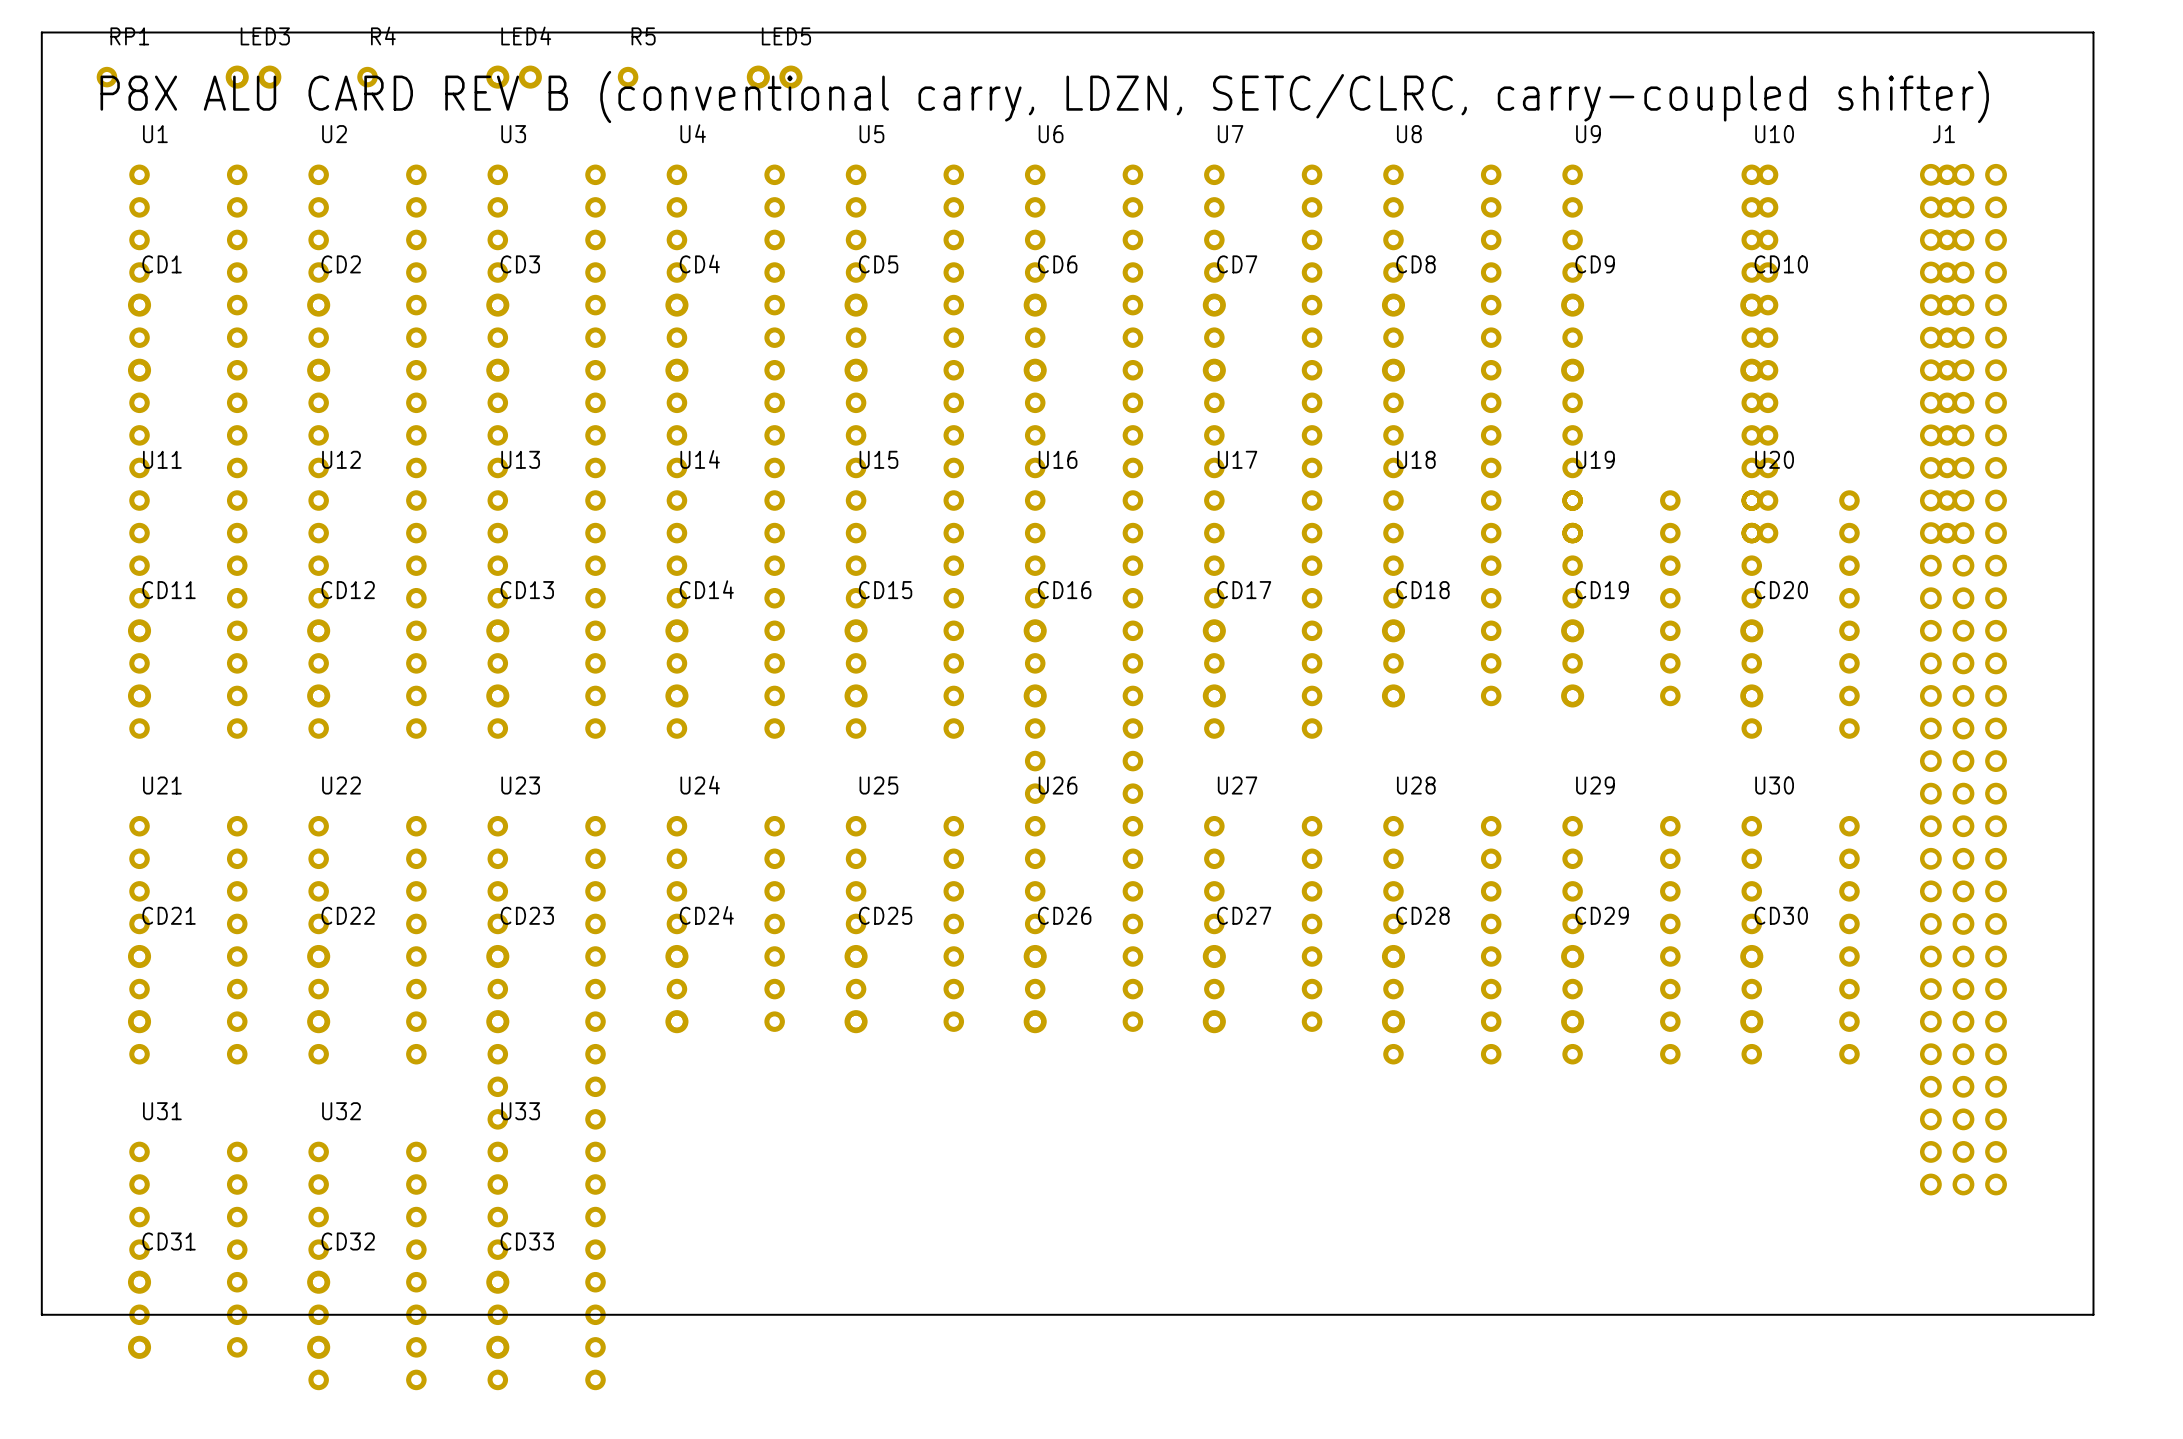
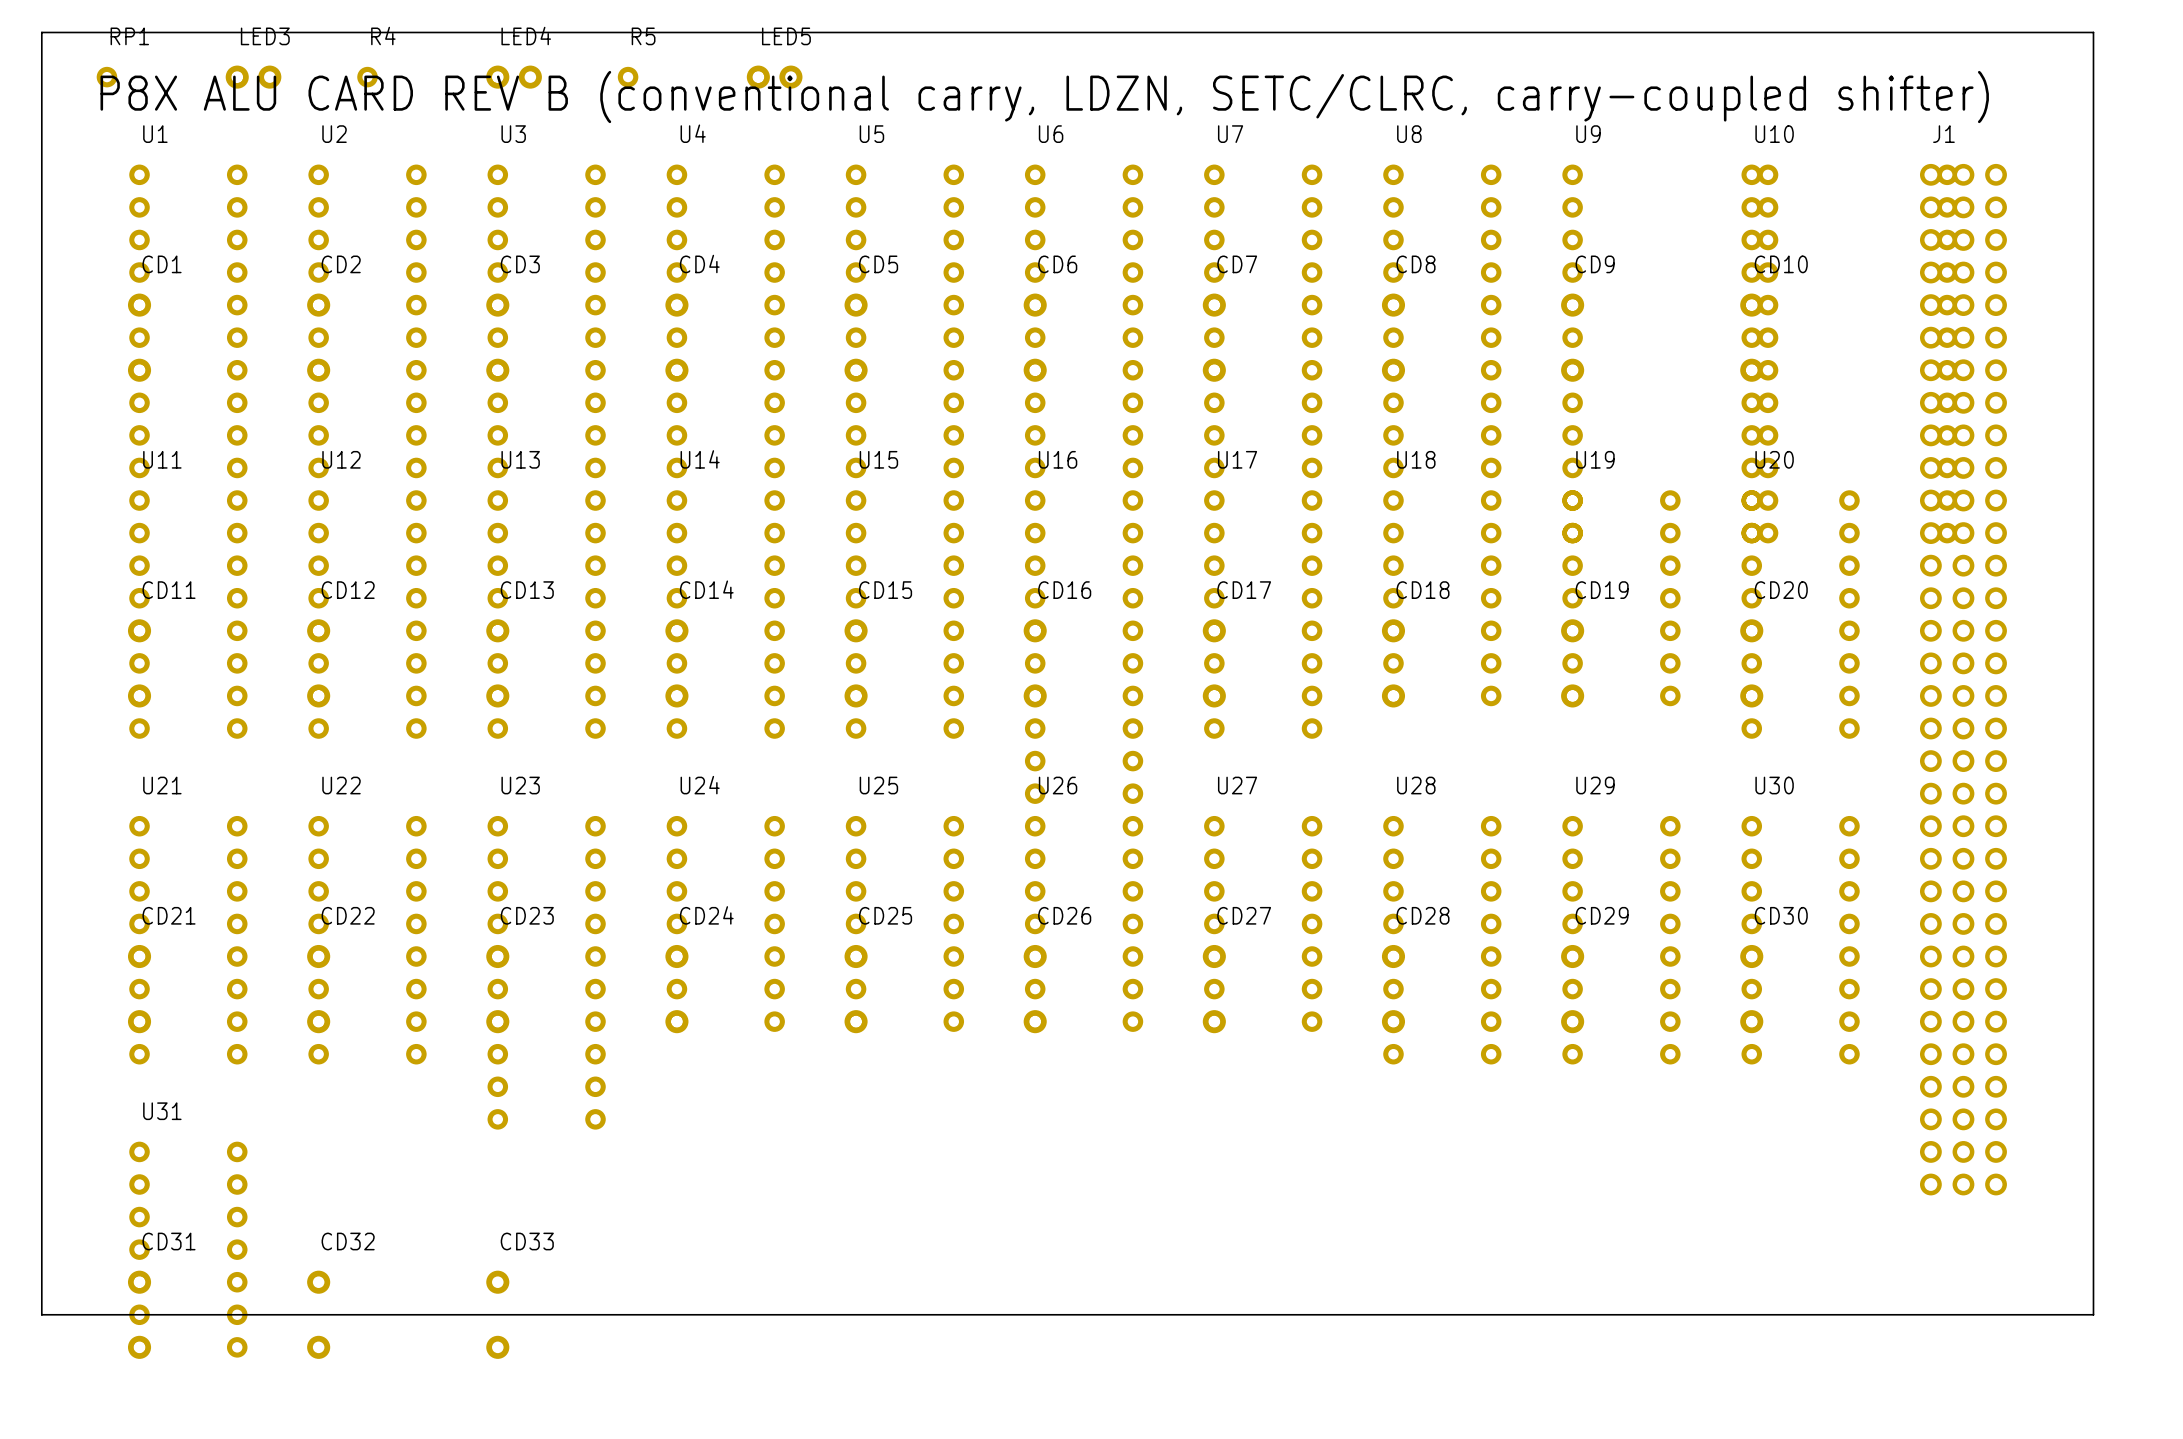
U32: (367, 1265) -> none
U33: (546, 1265) -> none

